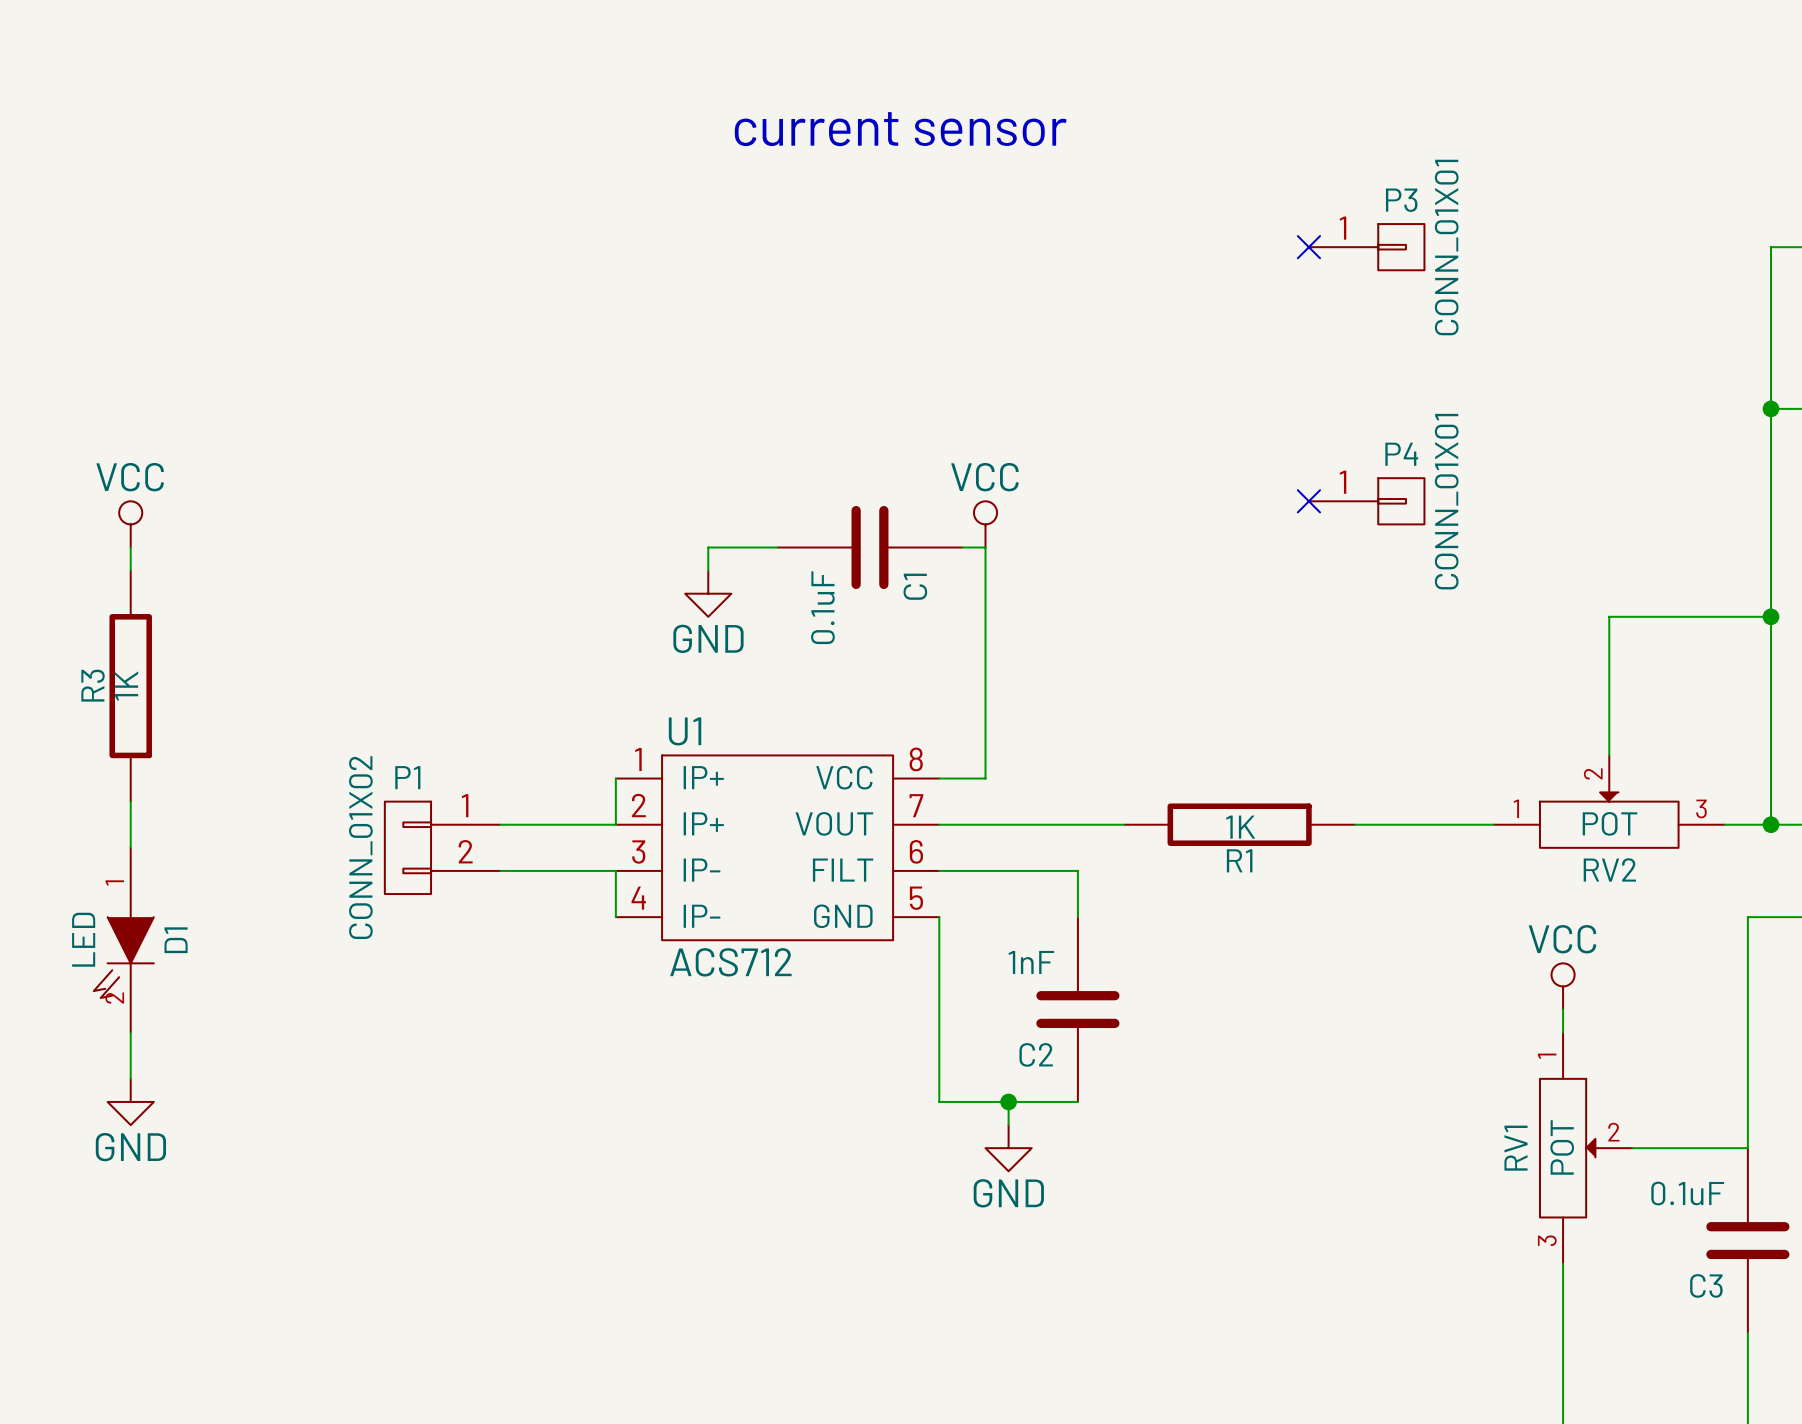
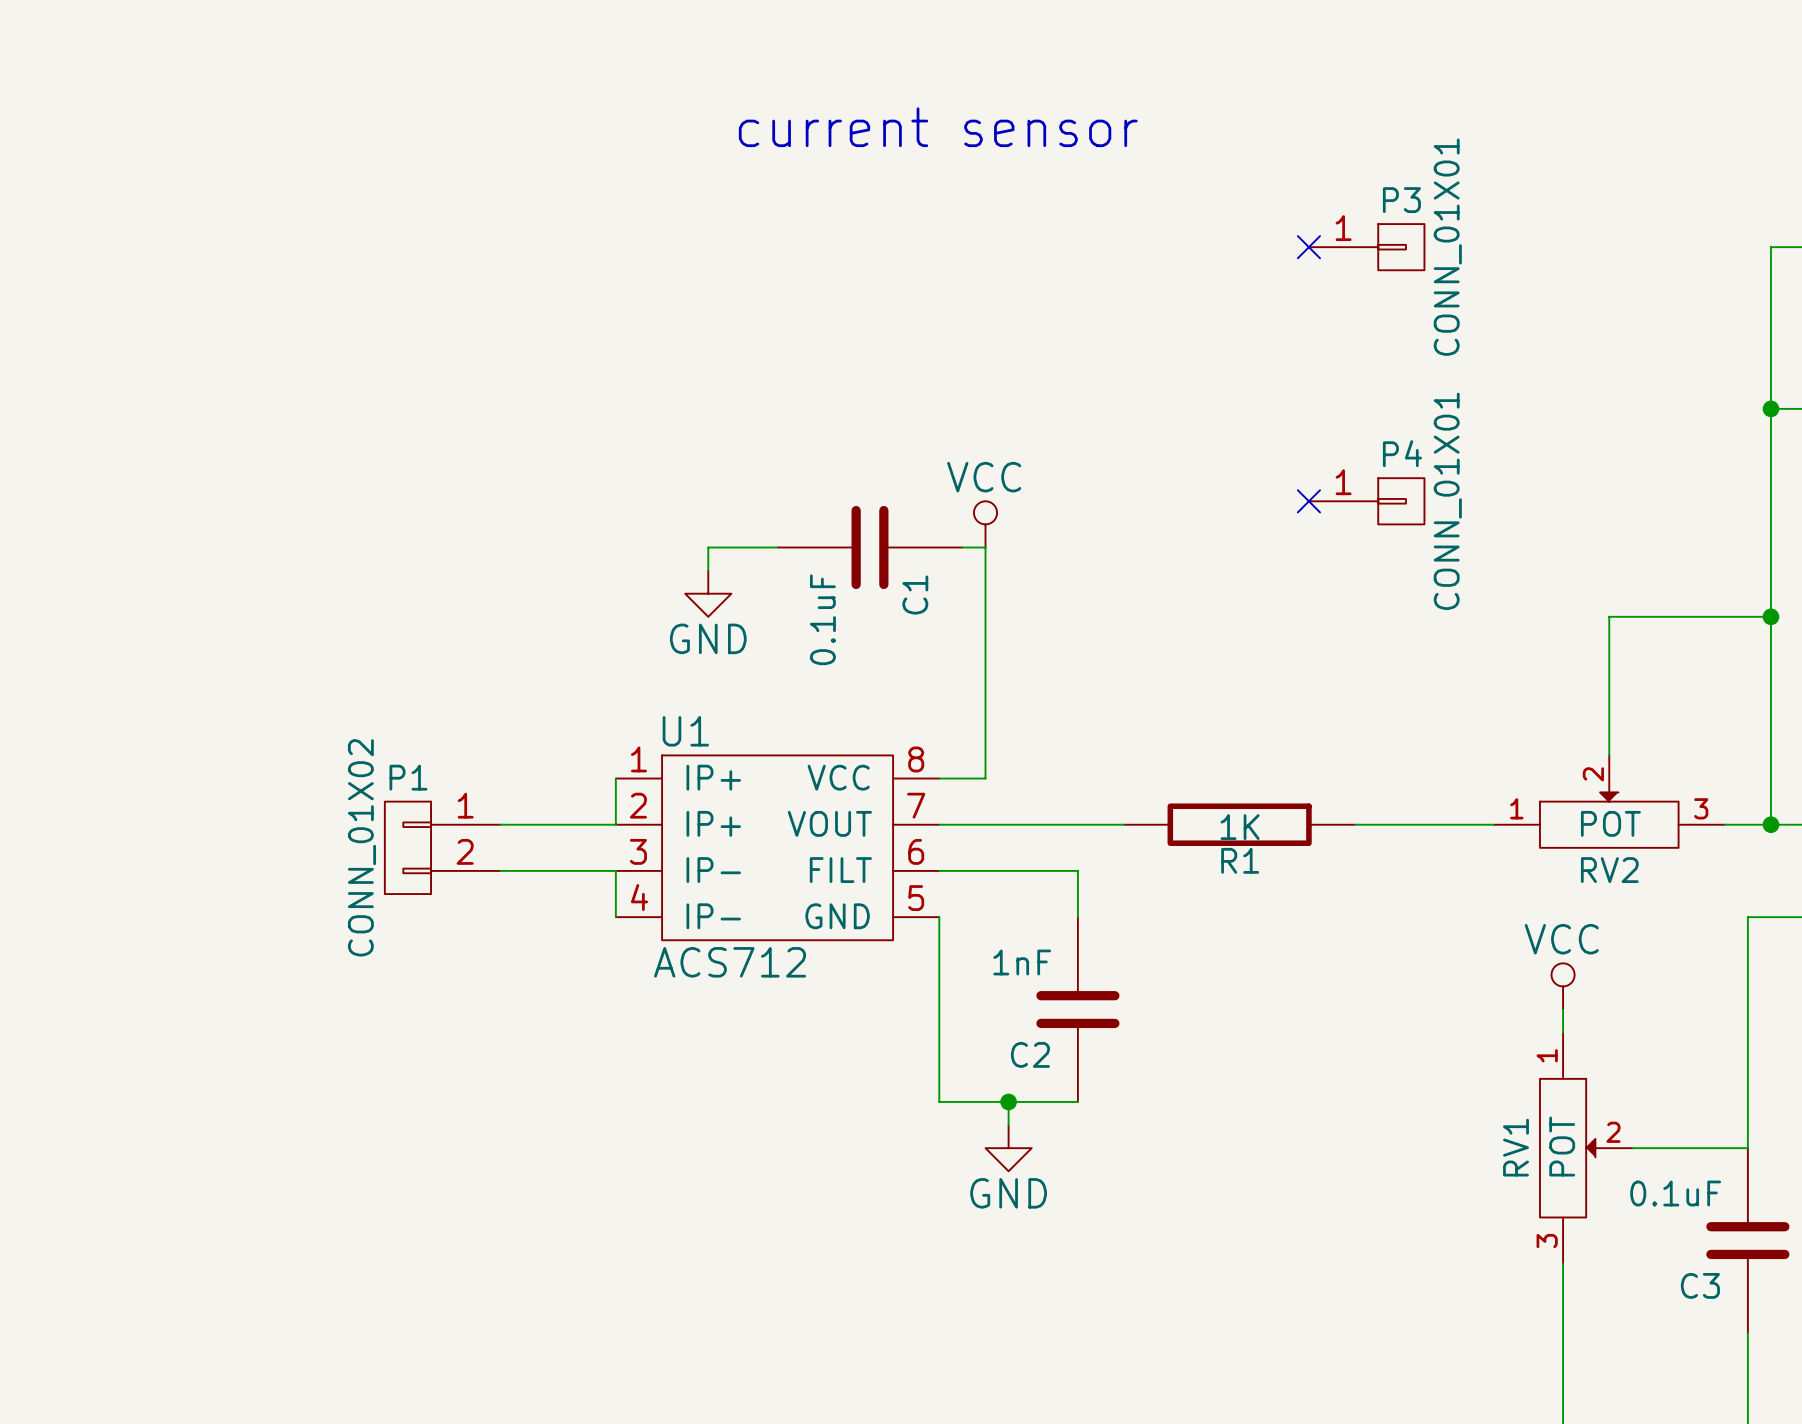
power symbol: VCC (130, 524) -> none
wire: (130, 547) (130, 570) -> none
R3: 1K (130, 686) -> none
wire: (130, 801) (130, 847) -> none
D1: LED (123, 940) -> none
wire: (130, 1032) (130, 1078) -> none
power symbol: GND (130, 1101) -> none

